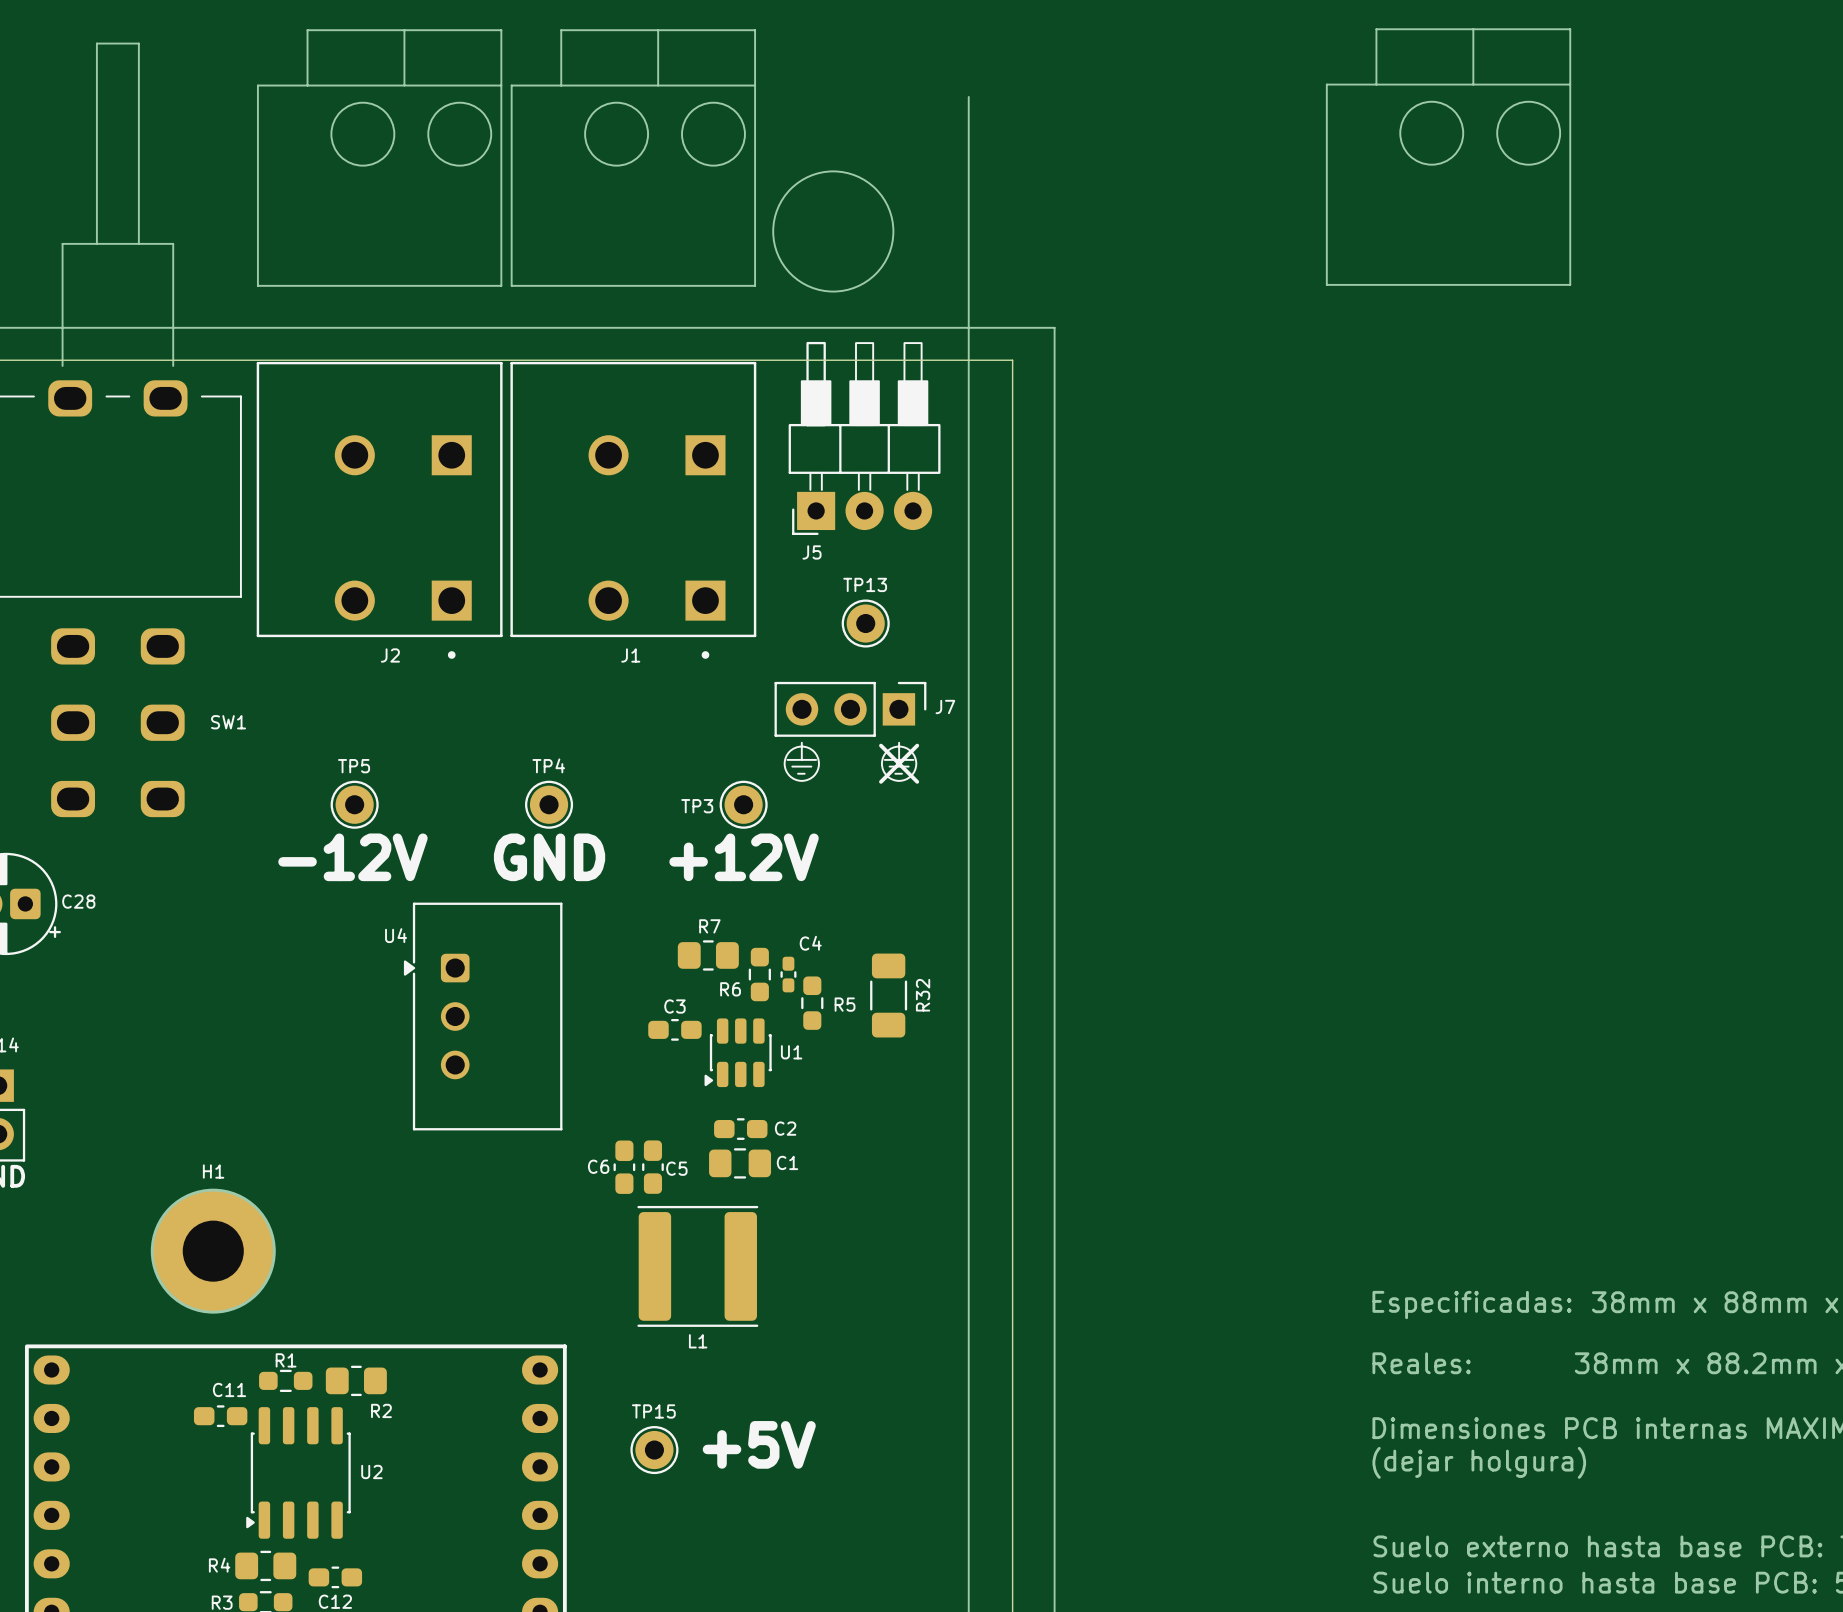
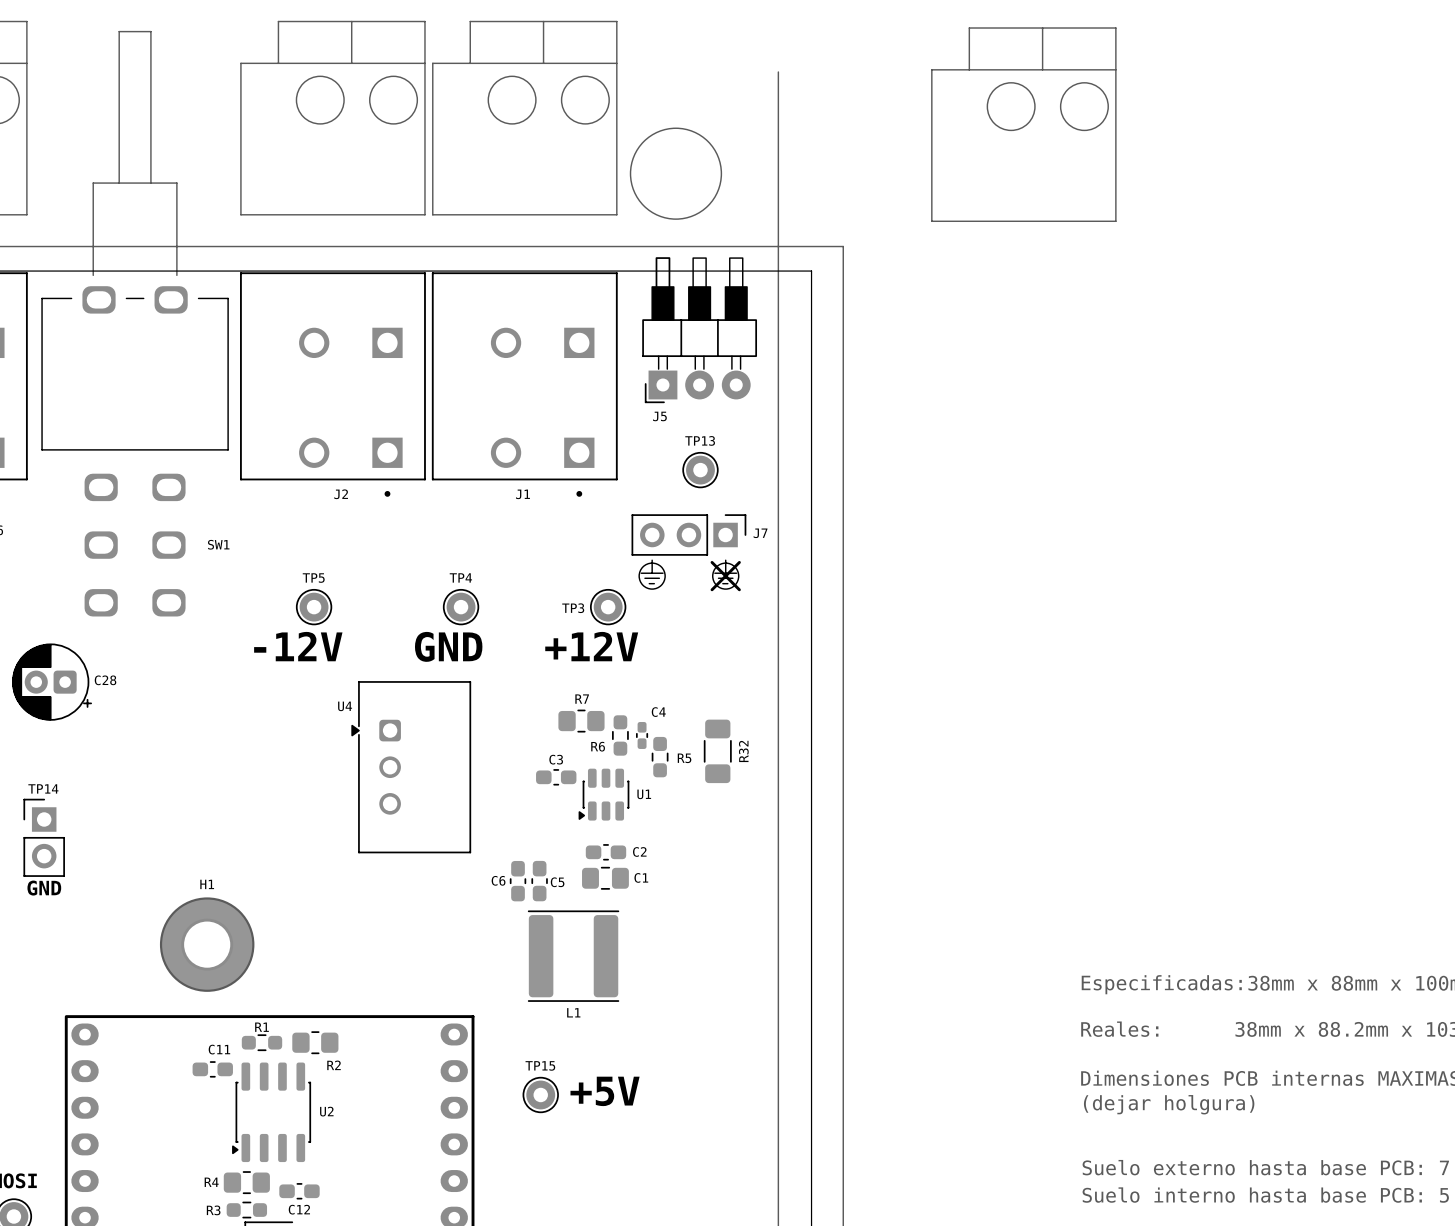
line: (1473, 29) (1473, 84) -> (1042, 28) (1042, 69)
line: (1376, 84) (1376, 29) (1570, 29) (1570, 284) (1326, 284) (1326, 84) (1570, 84) -> (969, 69) (969, 28) (1115, 28) (1115, 221) (931, 221) (931, 69) (1115, 69)
drawing: [1496, 100, 1562, 166] -> none
drawing: none -> [986, 82, 1036, 132]
drawing position: (1431, 133) -> (1084, 106)

